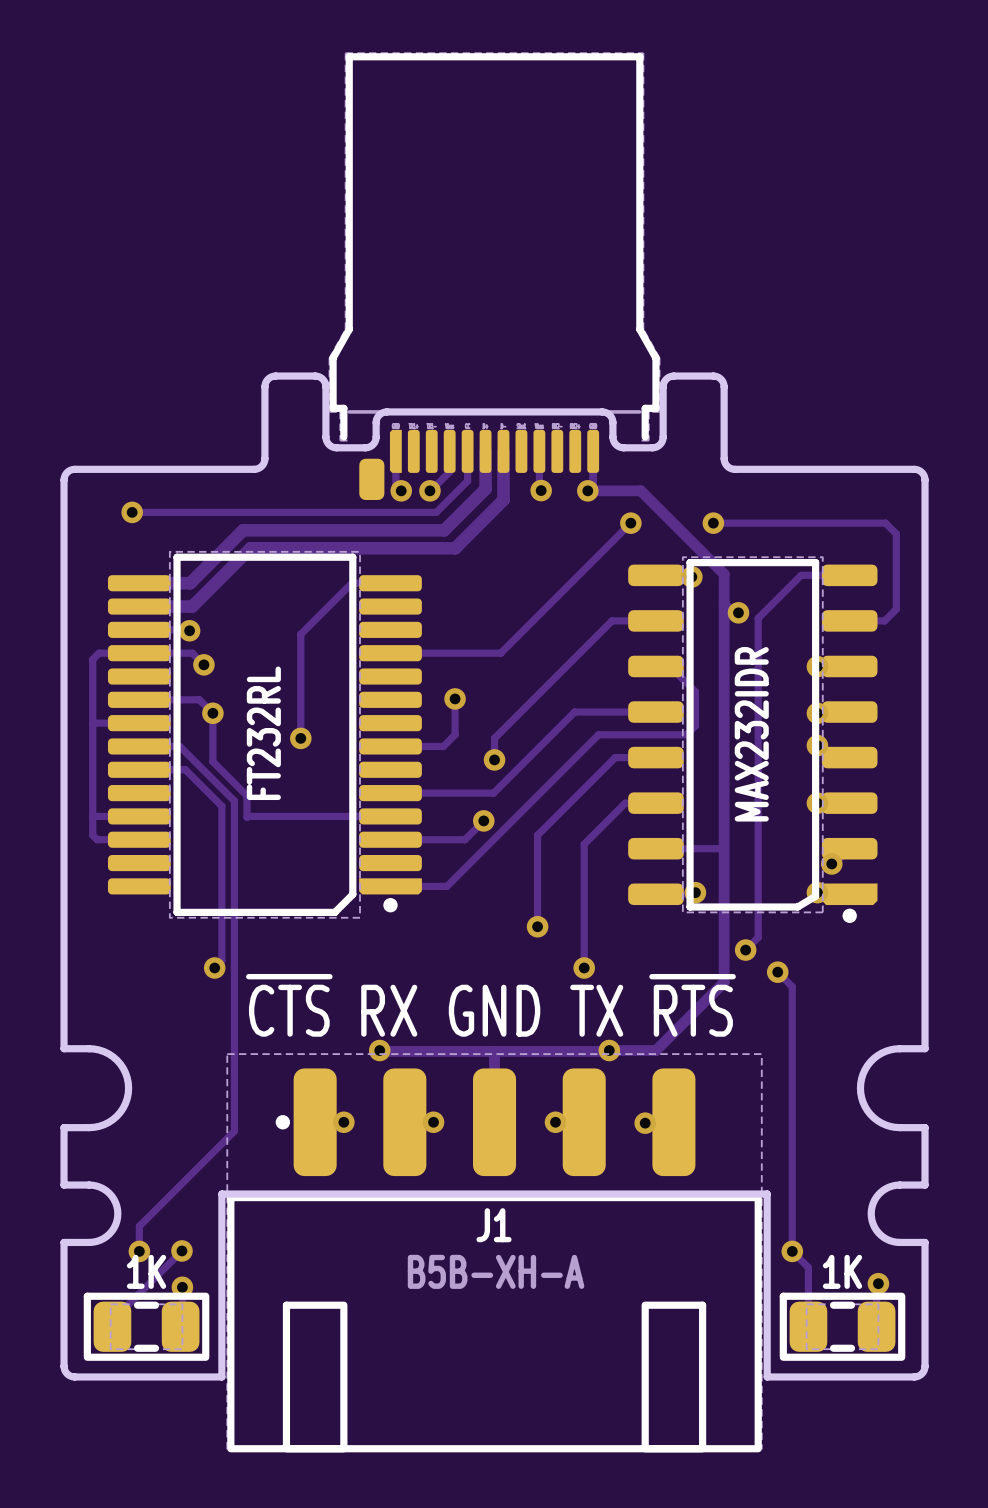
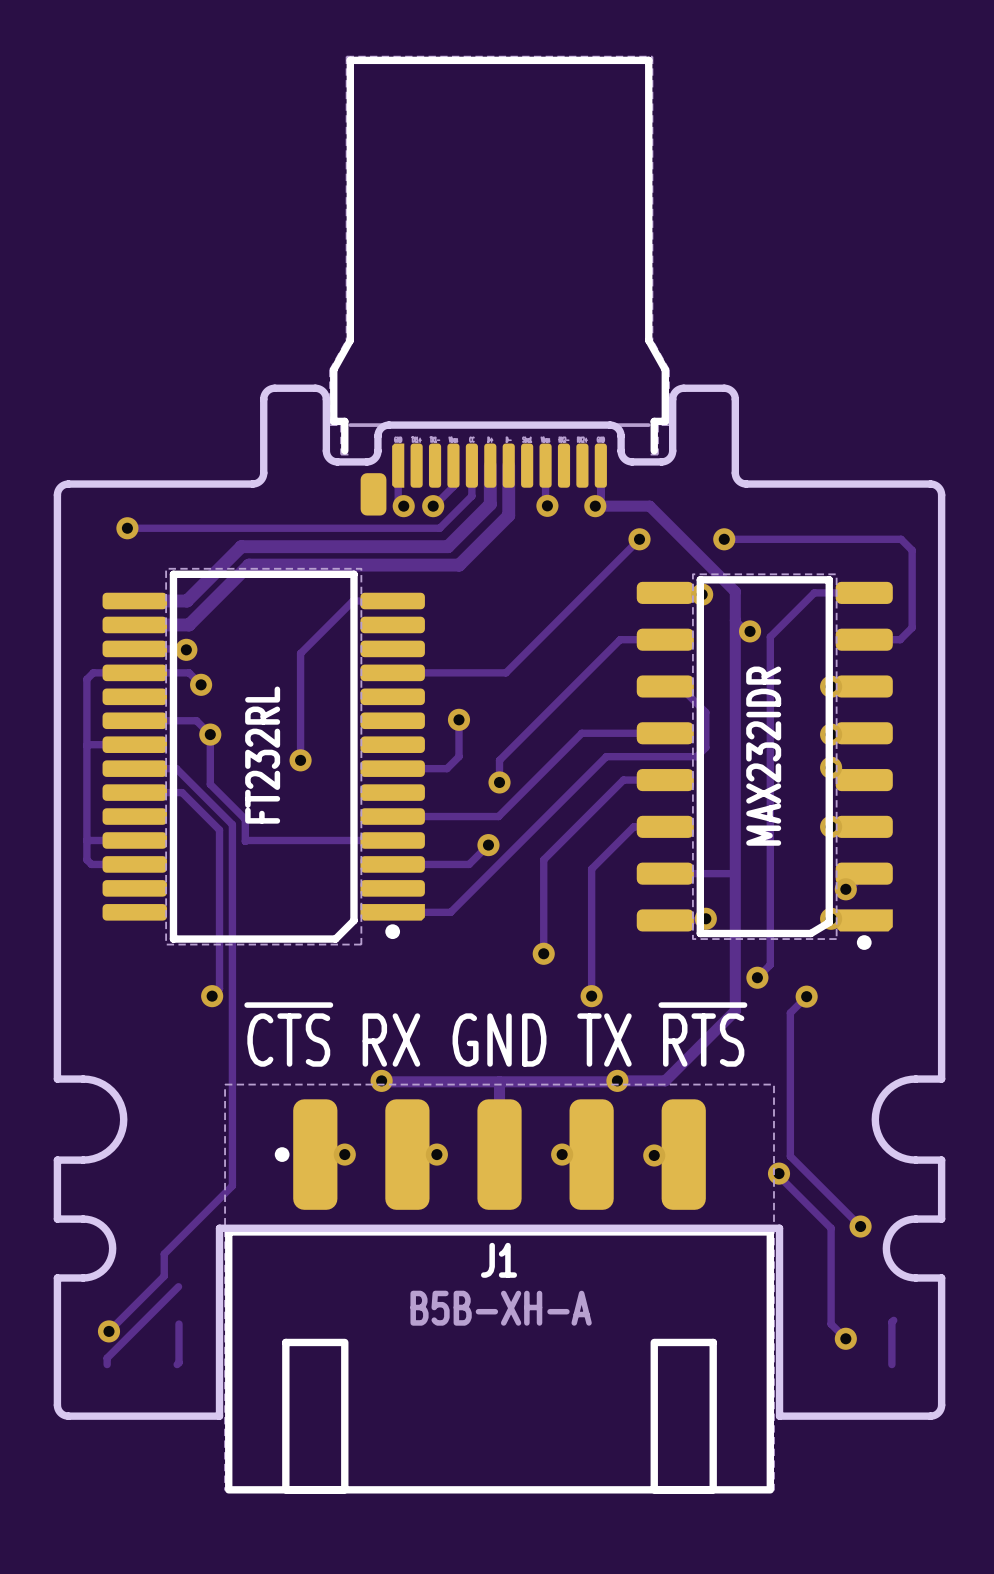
track: none -> (806, 996) (790, 1012) (790, 1156) (860, 1226)
track: (777, 972) (792, 986) (792, 1251) (808, 1267) (808, 1326) -> none
via position: (777, 972) -> (806, 996)
track: (234, 1131) (139, 1226) (139, 1251) -> (232, 1163) (232, 1185) (164, 1254) (164, 1276) (108, 1331)
track: none -> (779, 1173) (779, 1176) (831, 1228) (831, 1324) (845, 1338)
via: none -> (779, 1173)
via: none -> (860, 1226)
via: (181, 1250) -> none
via: (139, 1251) -> none
via: (792, 1251) -> none
via: (878, 1283) -> none
via: (182, 1287) -> none
via: none -> (108, 1331)
via: none -> (845, 1338)
part: 1K (146, 1326) -> none
part: 1K (842, 1326) -> none

